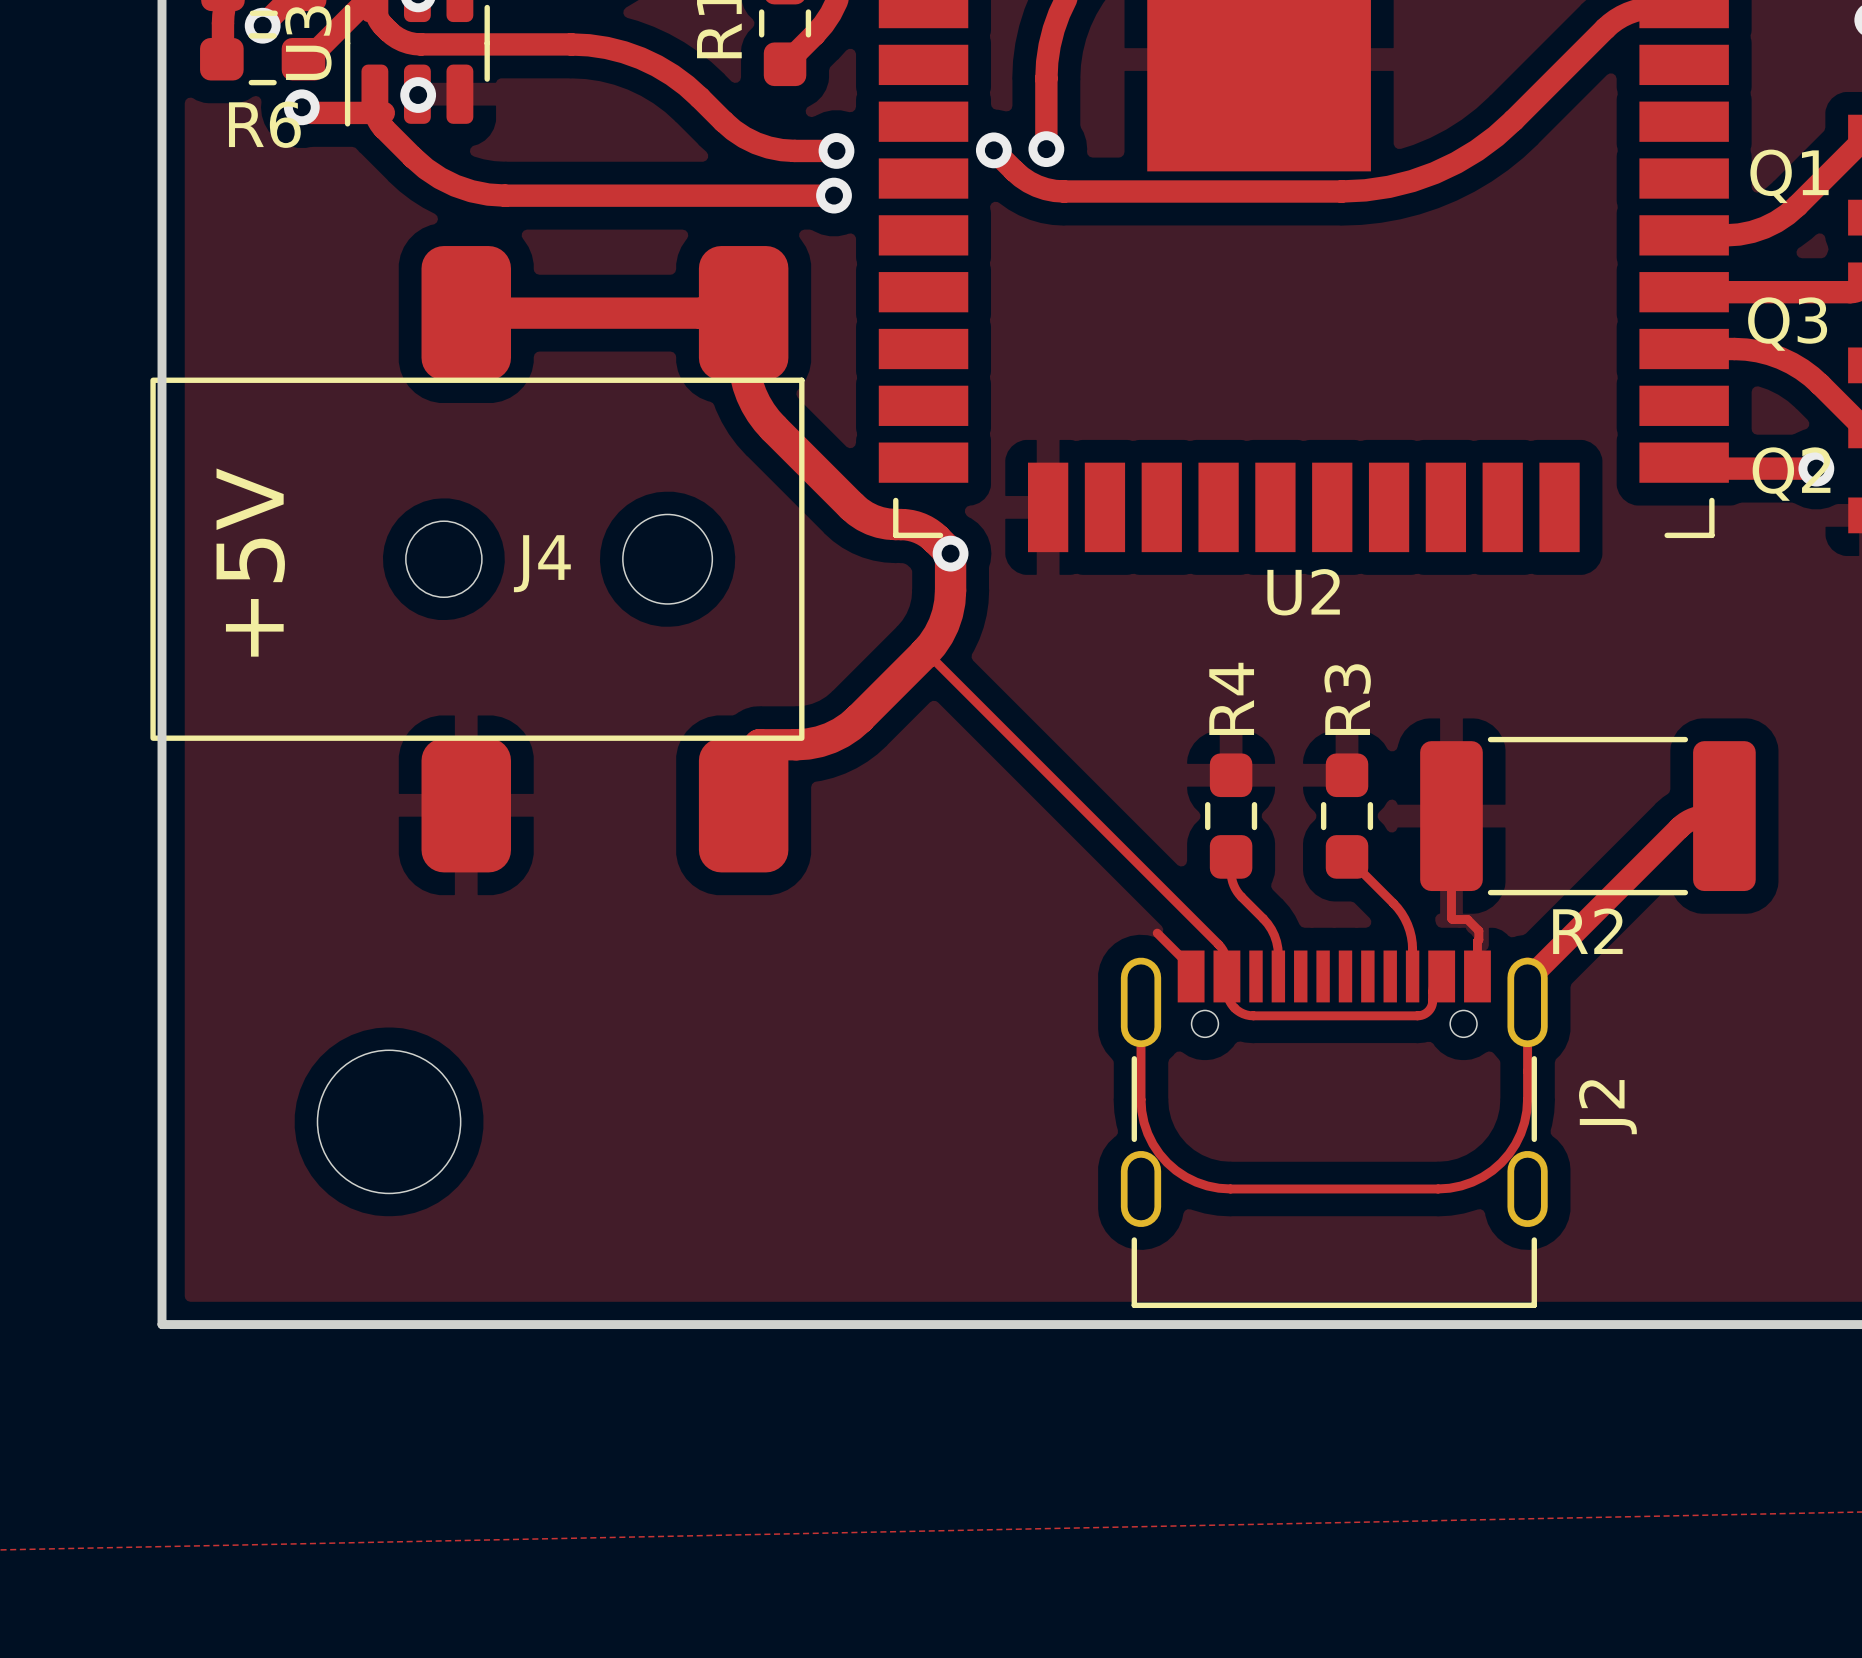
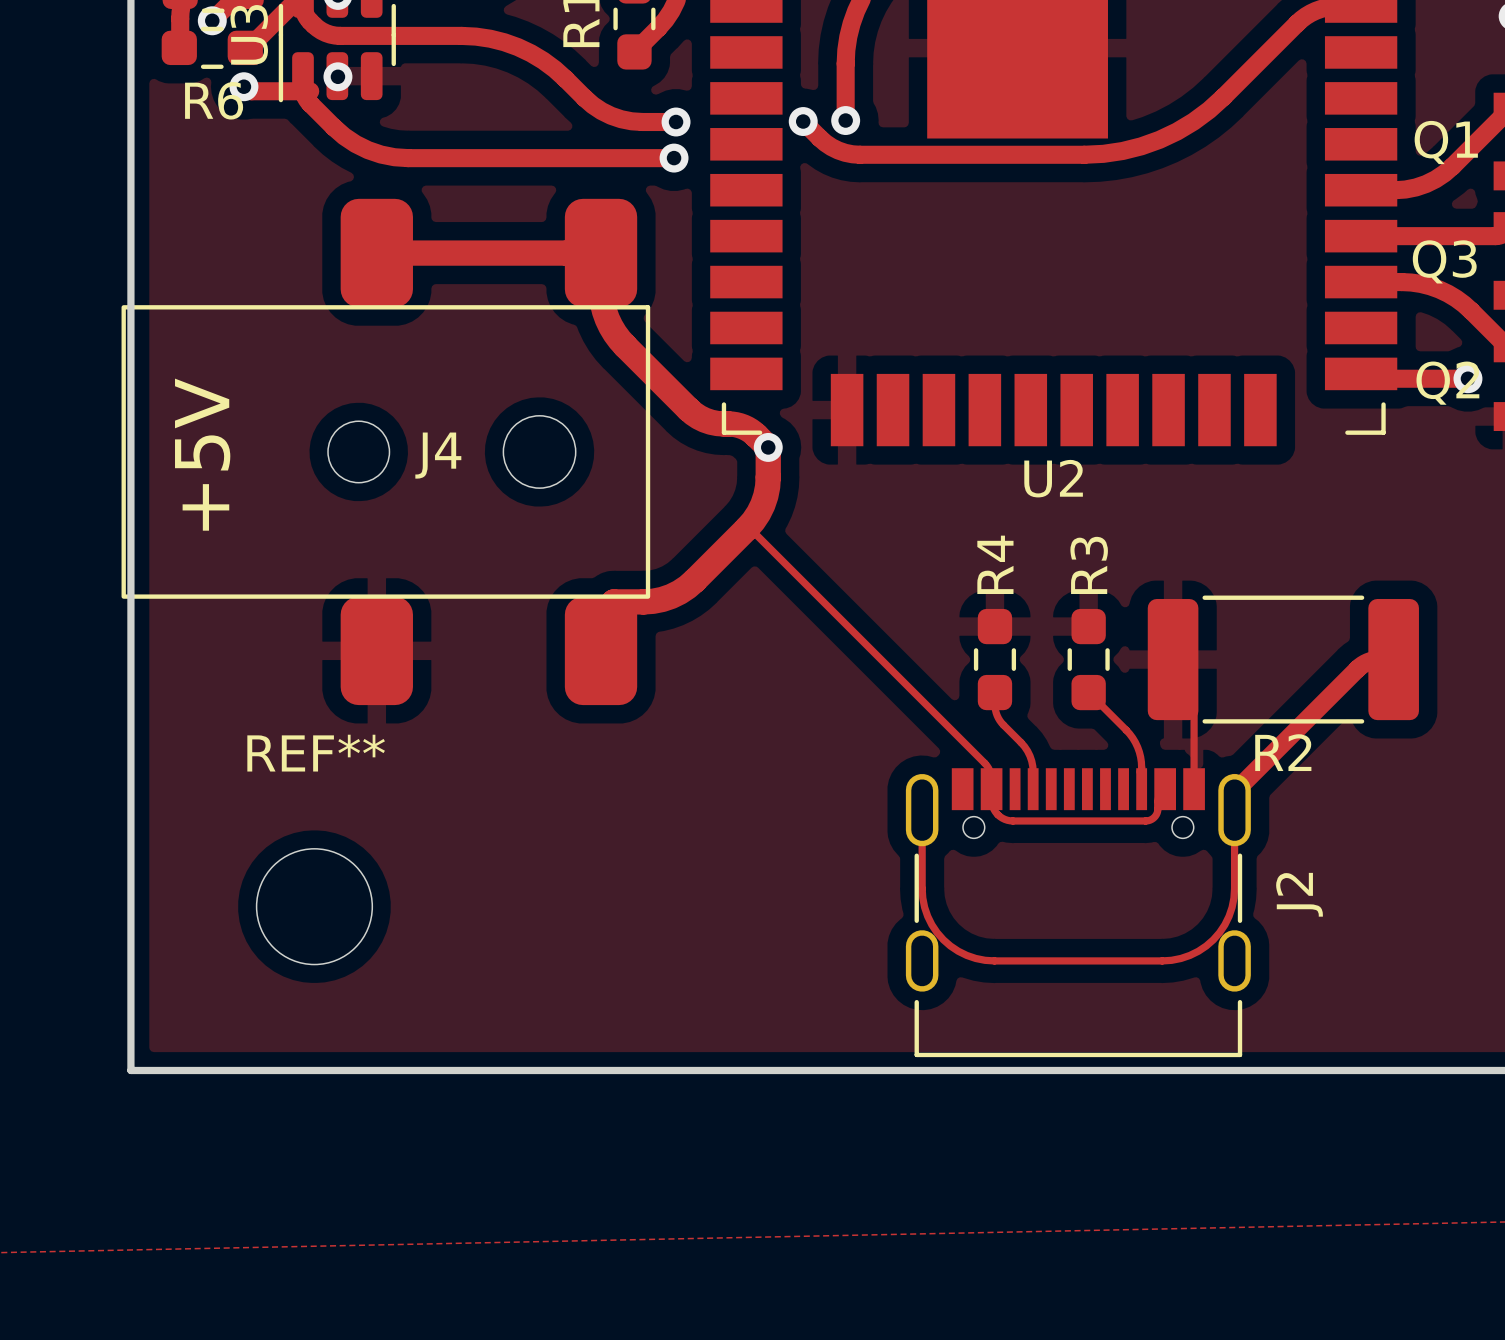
track: (1451, 816) (1451, 918) (1467, 919) (1478, 930) (1477, 941) -> (1194, 695) (1194, 760)
REF** name: none -> REF** (316, 753)
track: (1157, 933) (1191, 967) (1191, 976) -> none

